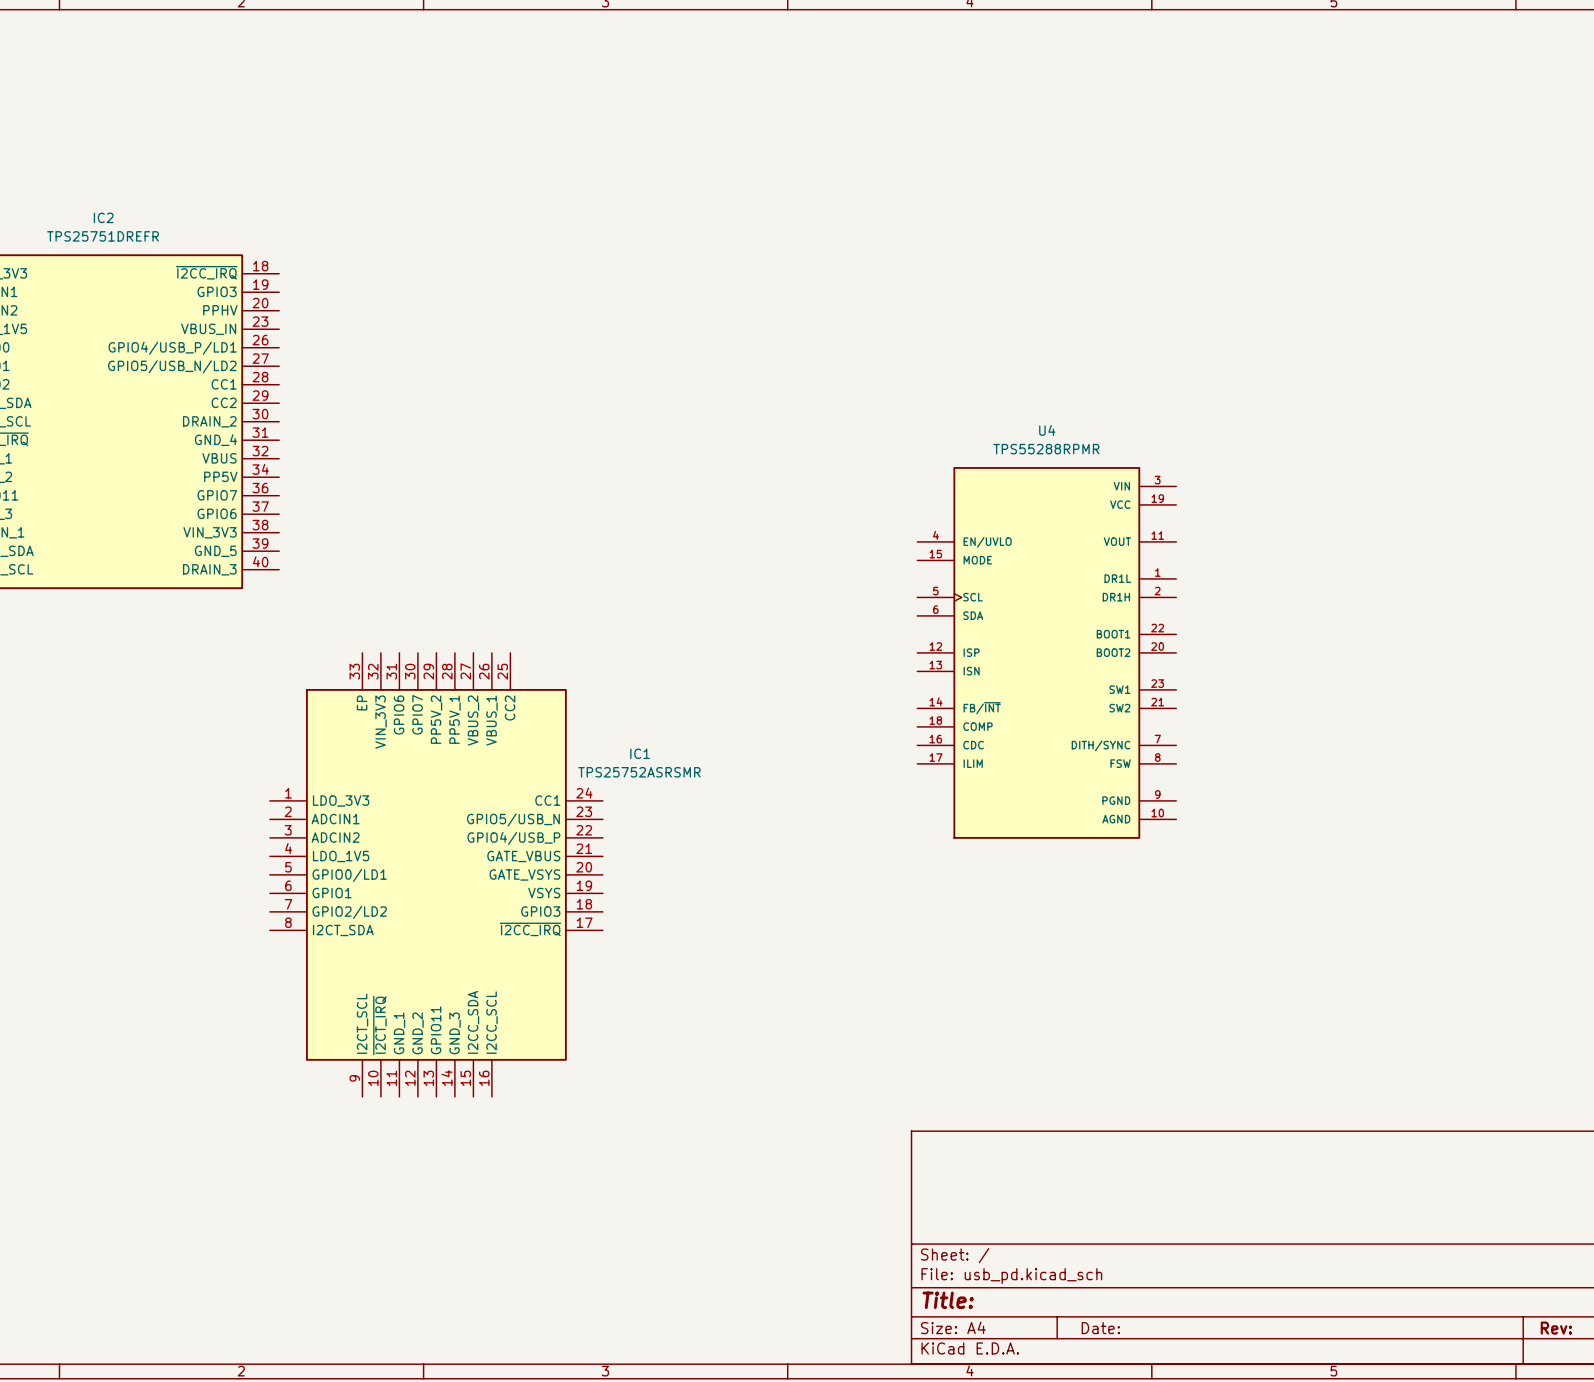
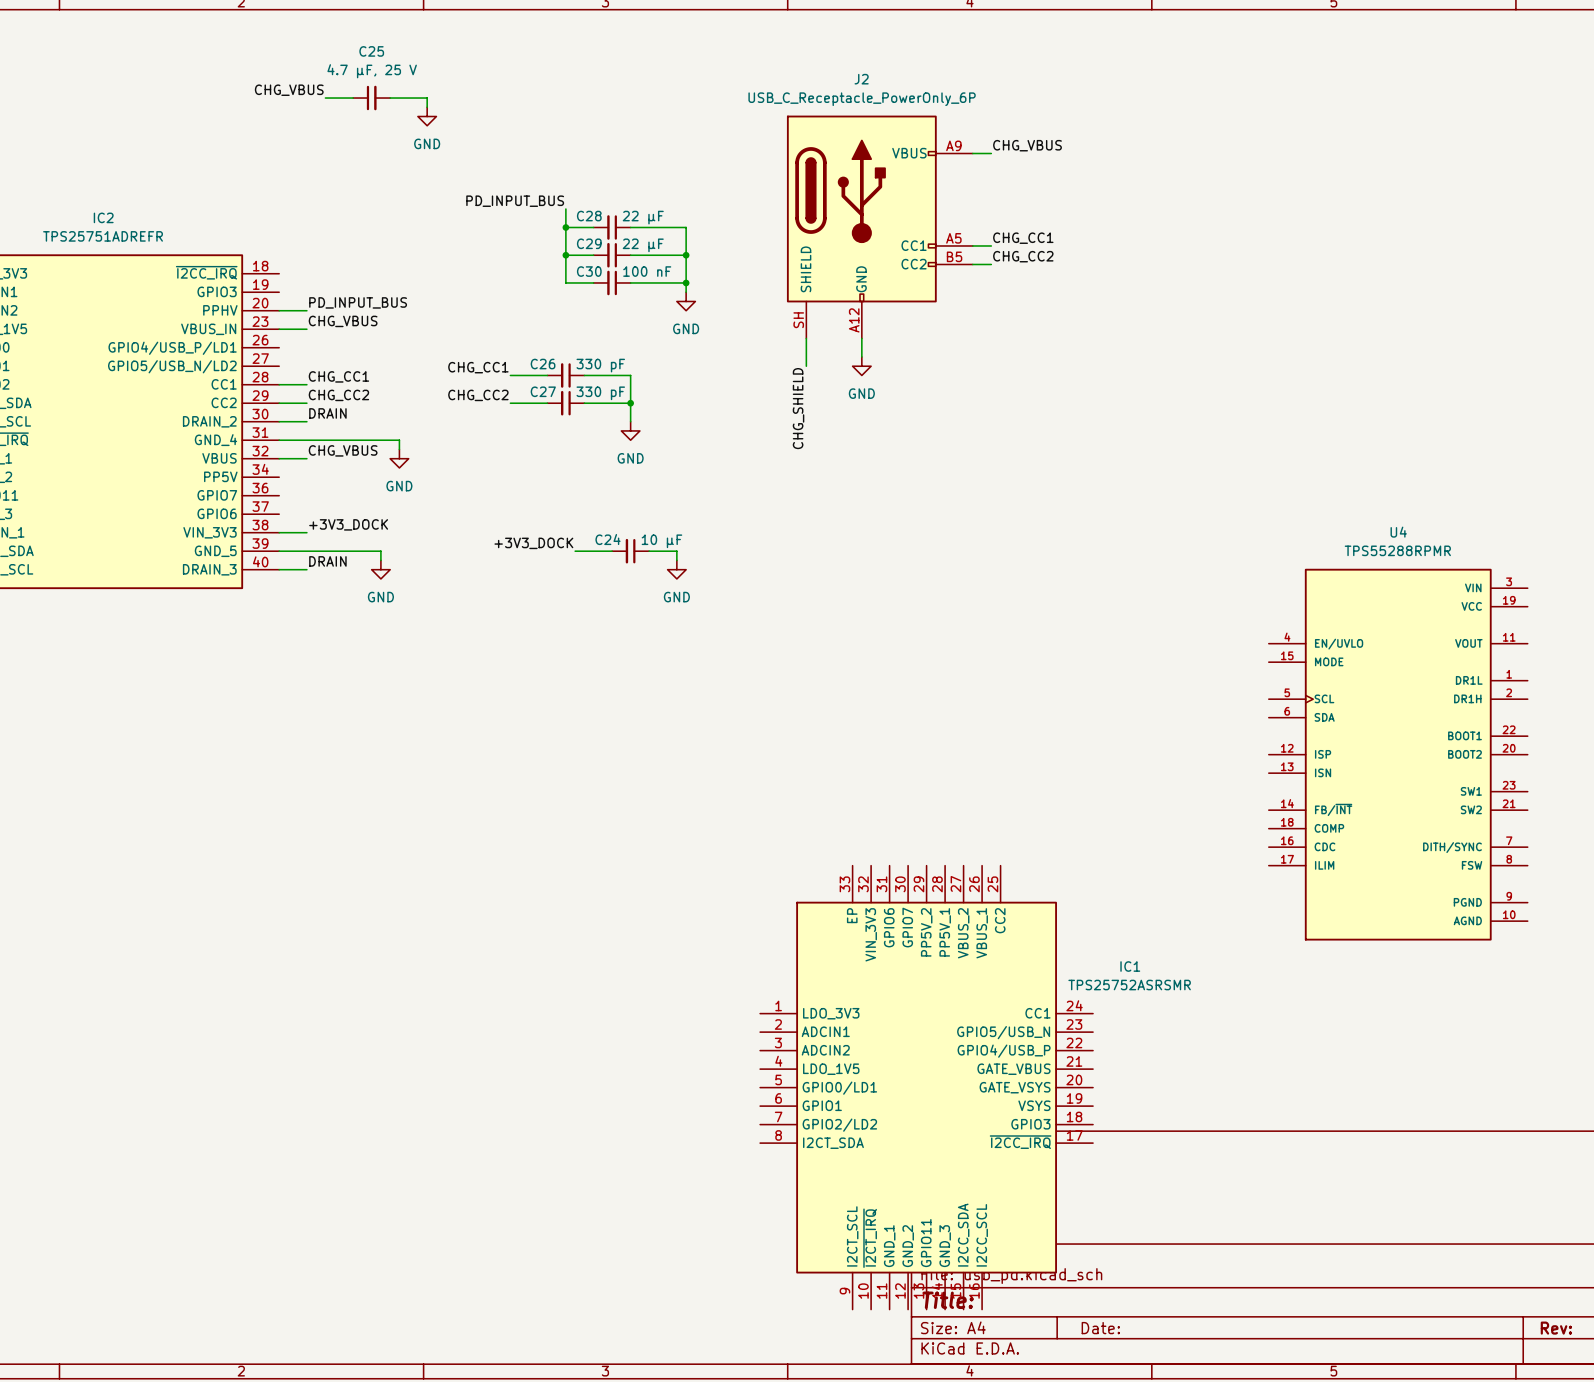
label: none -> CHG_VBUS (289, 90)
wire: none -> (325, 98) (353, 98)
C25: none -> 4.7 µF, 25 V (371, 98)
wire: none -> (390, 98) (427, 98) (427, 107)
power symbol: none -> GND (427, 116)
label: none -> CHG_VBUS (1027, 145)
wire: none -> (972, 153) (991, 153)
label: none -> PD_INPUT_BUS (515, 201)
wire: none -> (565, 209) (565, 282) (593, 282)
wire: none -> (565, 227) (593, 227)
junction: none -> (565, 227)
C28: none -> 22 µF (612, 227)
wire: none -> (630, 227) (686, 227) (686, 292)
J2: none -> USB_C_Receptacle_PowerOnly_6P (879, 227)
IC2 value: TPS25751DREFR (103, 236) -> TPS25751ADREFR (103, 236)
label: none -> CHG_CC1 (1023, 238)
wire: none -> (972, 245) (991, 245)
wire: none -> (565, 255) (593, 255)
junction: none -> (565, 255)
C29: none -> 22 µF (612, 255)
wire: none -> (630, 255) (686, 255)
junction: none -> (686, 255)
label: none -> CHG_CC2 (1023, 256)
wire: none -> (972, 264) (991, 264)
C30: none -> 100 nF (612, 282)
wire: none -> (630, 282) (686, 282)
junction: none -> (686, 282)
power symbol: none -> GND (686, 301)
label: none -> PD_INPUT_BUS (358, 302)
wire: none -> (279, 310) (306, 310)
label: none -> CHG_VBUS (343, 321)
wire: none -> (279, 329) (306, 329)
wire: none -> (806, 338) (806, 366)
wire: none -> (861, 338) (861, 356)
power symbol: none -> GND (861, 366)
label: none -> CHG_CC1 (478, 367)
wire: none -> (510, 375) (547, 375)
C26: none -> 330 pF (565, 375)
wire: none -> (584, 375) (630, 375) (630, 421)
label: none -> CHG_CC1 (338, 376)
wire: none -> (279, 384) (306, 384)
label: none -> CHG_CC2 (338, 395)
label: none -> CHG_CC2 (478, 395)
wire: none -> (279, 403) (306, 403)
wire: none -> (510, 403) (547, 403)
C27: none -> 330 pF (565, 403)
wire: none -> (584, 403) (630, 403)
junction: none -> (630, 403)
label: none -> CHG_SHIELD (798, 408)
label: none -> DRAIN (327, 413)
wire: none -> (279, 421) (306, 421)
power symbol: none -> GND (630, 430)
wire: none -> (279, 440) (399, 440) (399, 449)
label: none -> CHG_VBUS (343, 450)
wire: none -> (279, 458) (306, 458)
power symbol: none -> GND (399, 458)
label: none -> +3V3_DOCK (348, 524)
wire: none -> (279, 532) (306, 532)
label: none -> +3V3_DOCK (533, 543)
wire: none -> (279, 551) (380, 551) (380, 560)
wire: none -> (575, 551) (612, 551)
C24: none -> 10 µF (630, 551)
wire: none -> (649, 551) (676, 551) (676, 560)
label: none -> DRAIN (327, 561)
wire: none -> (279, 569) (306, 569)
power symbol: none -> GND (380, 569)
power symbol: none -> GND (676, 569)
U4 position: (1046, 652) -> (1398, 754)
IC1 position: (436, 874) -> (926, 1087)

